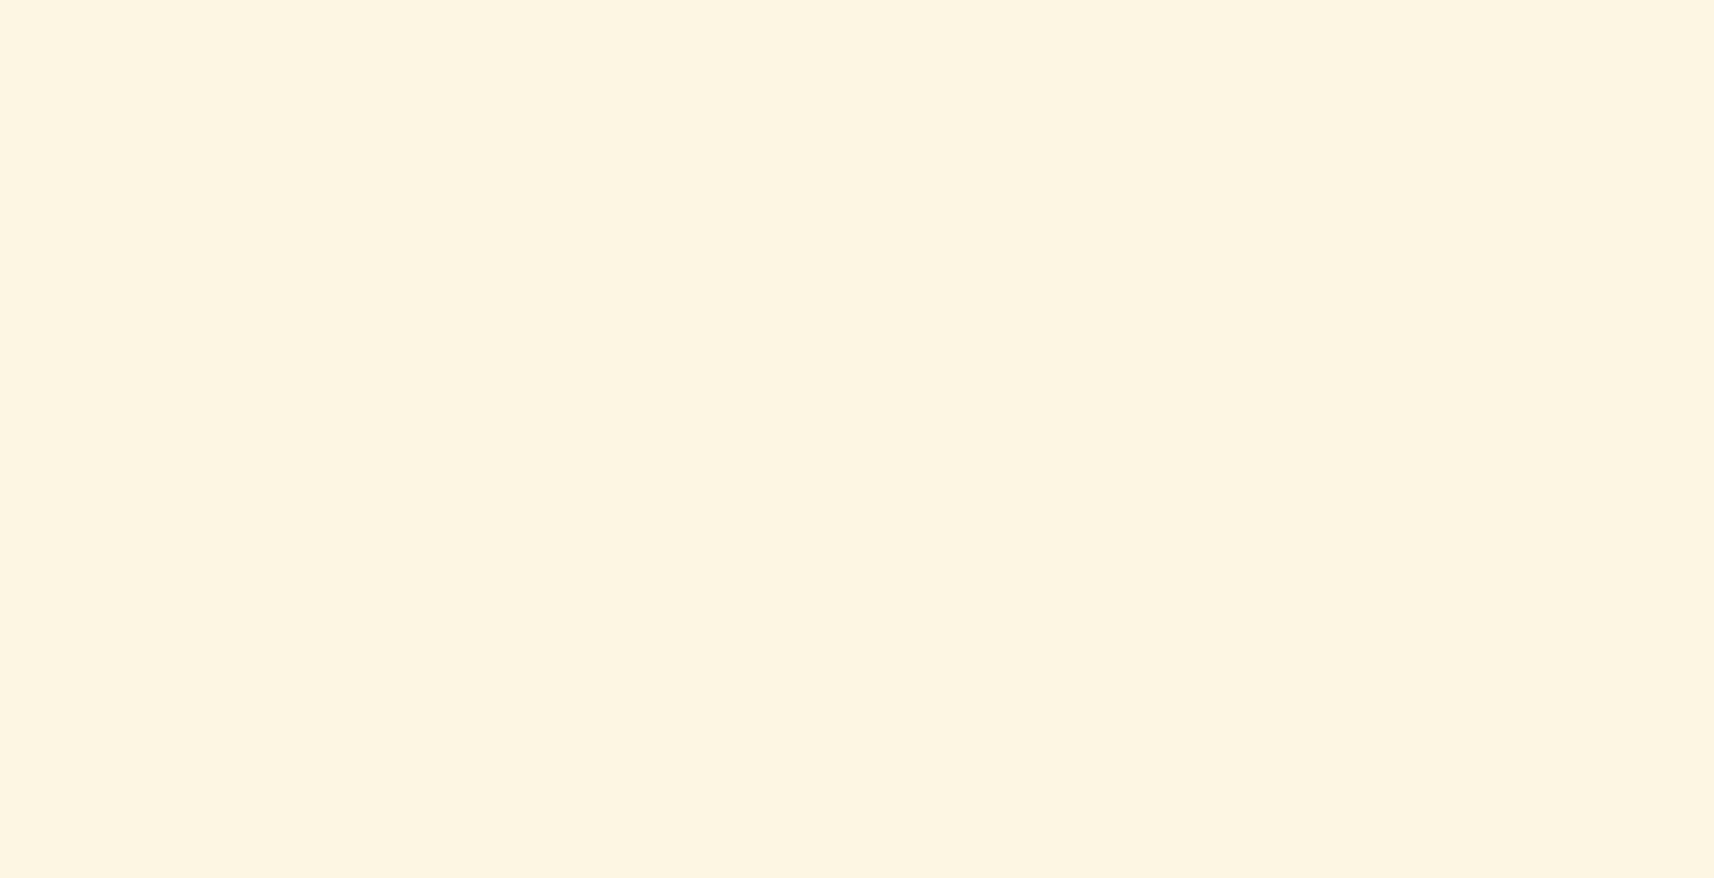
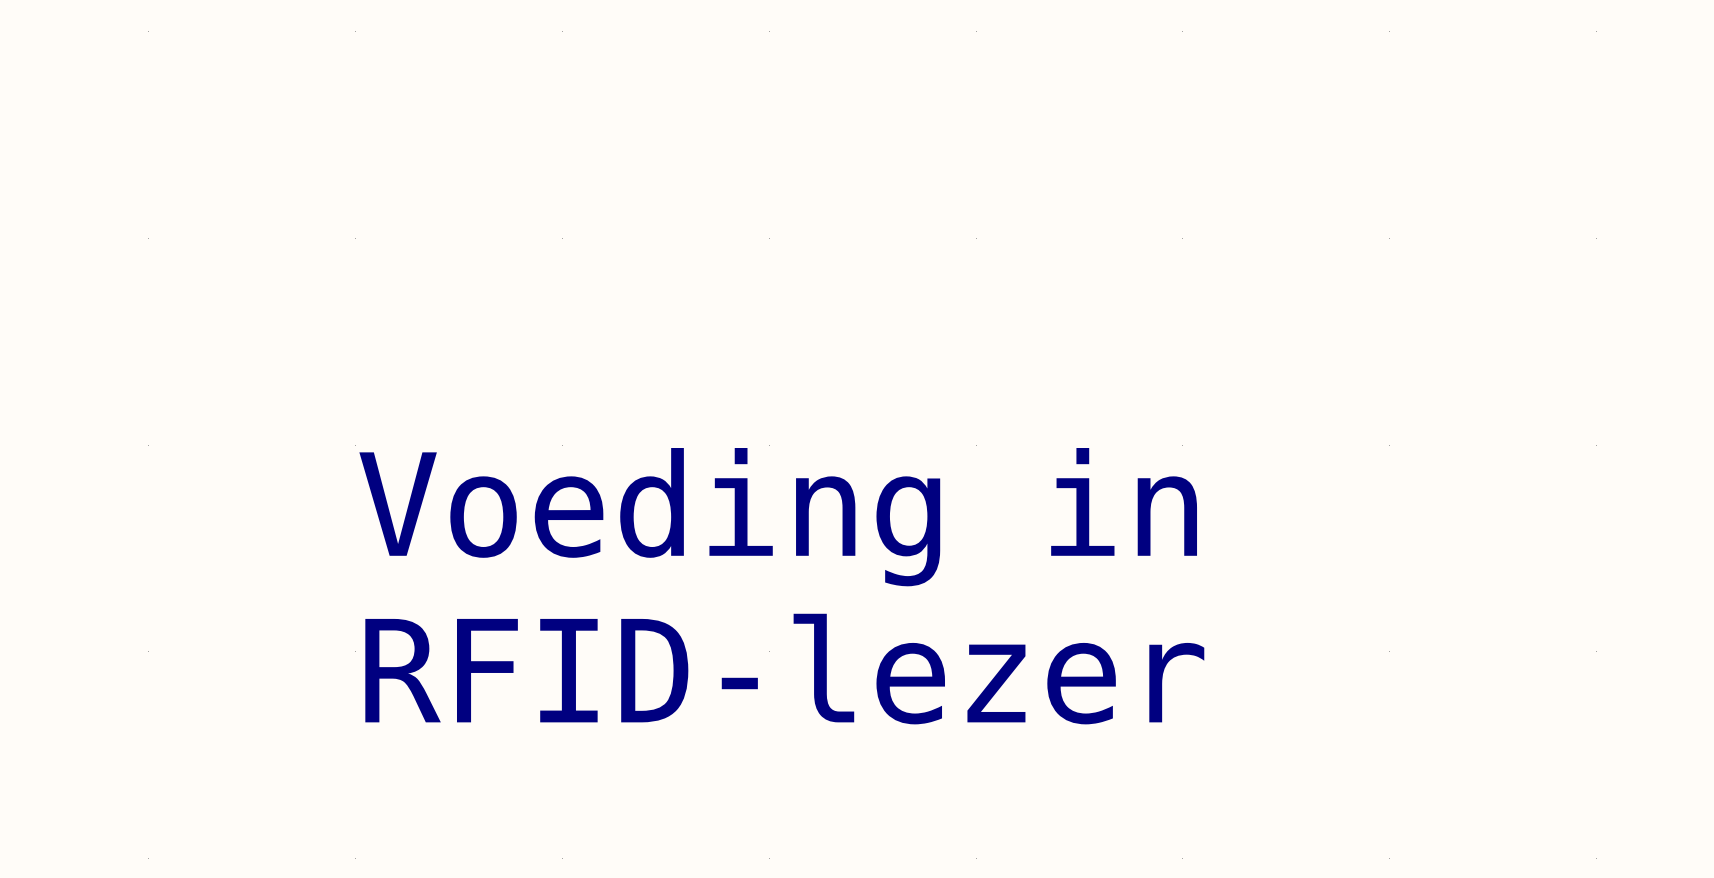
text: none -> Voeding in (778, 517)
text: none -> RFID-lezer (784, 669)

